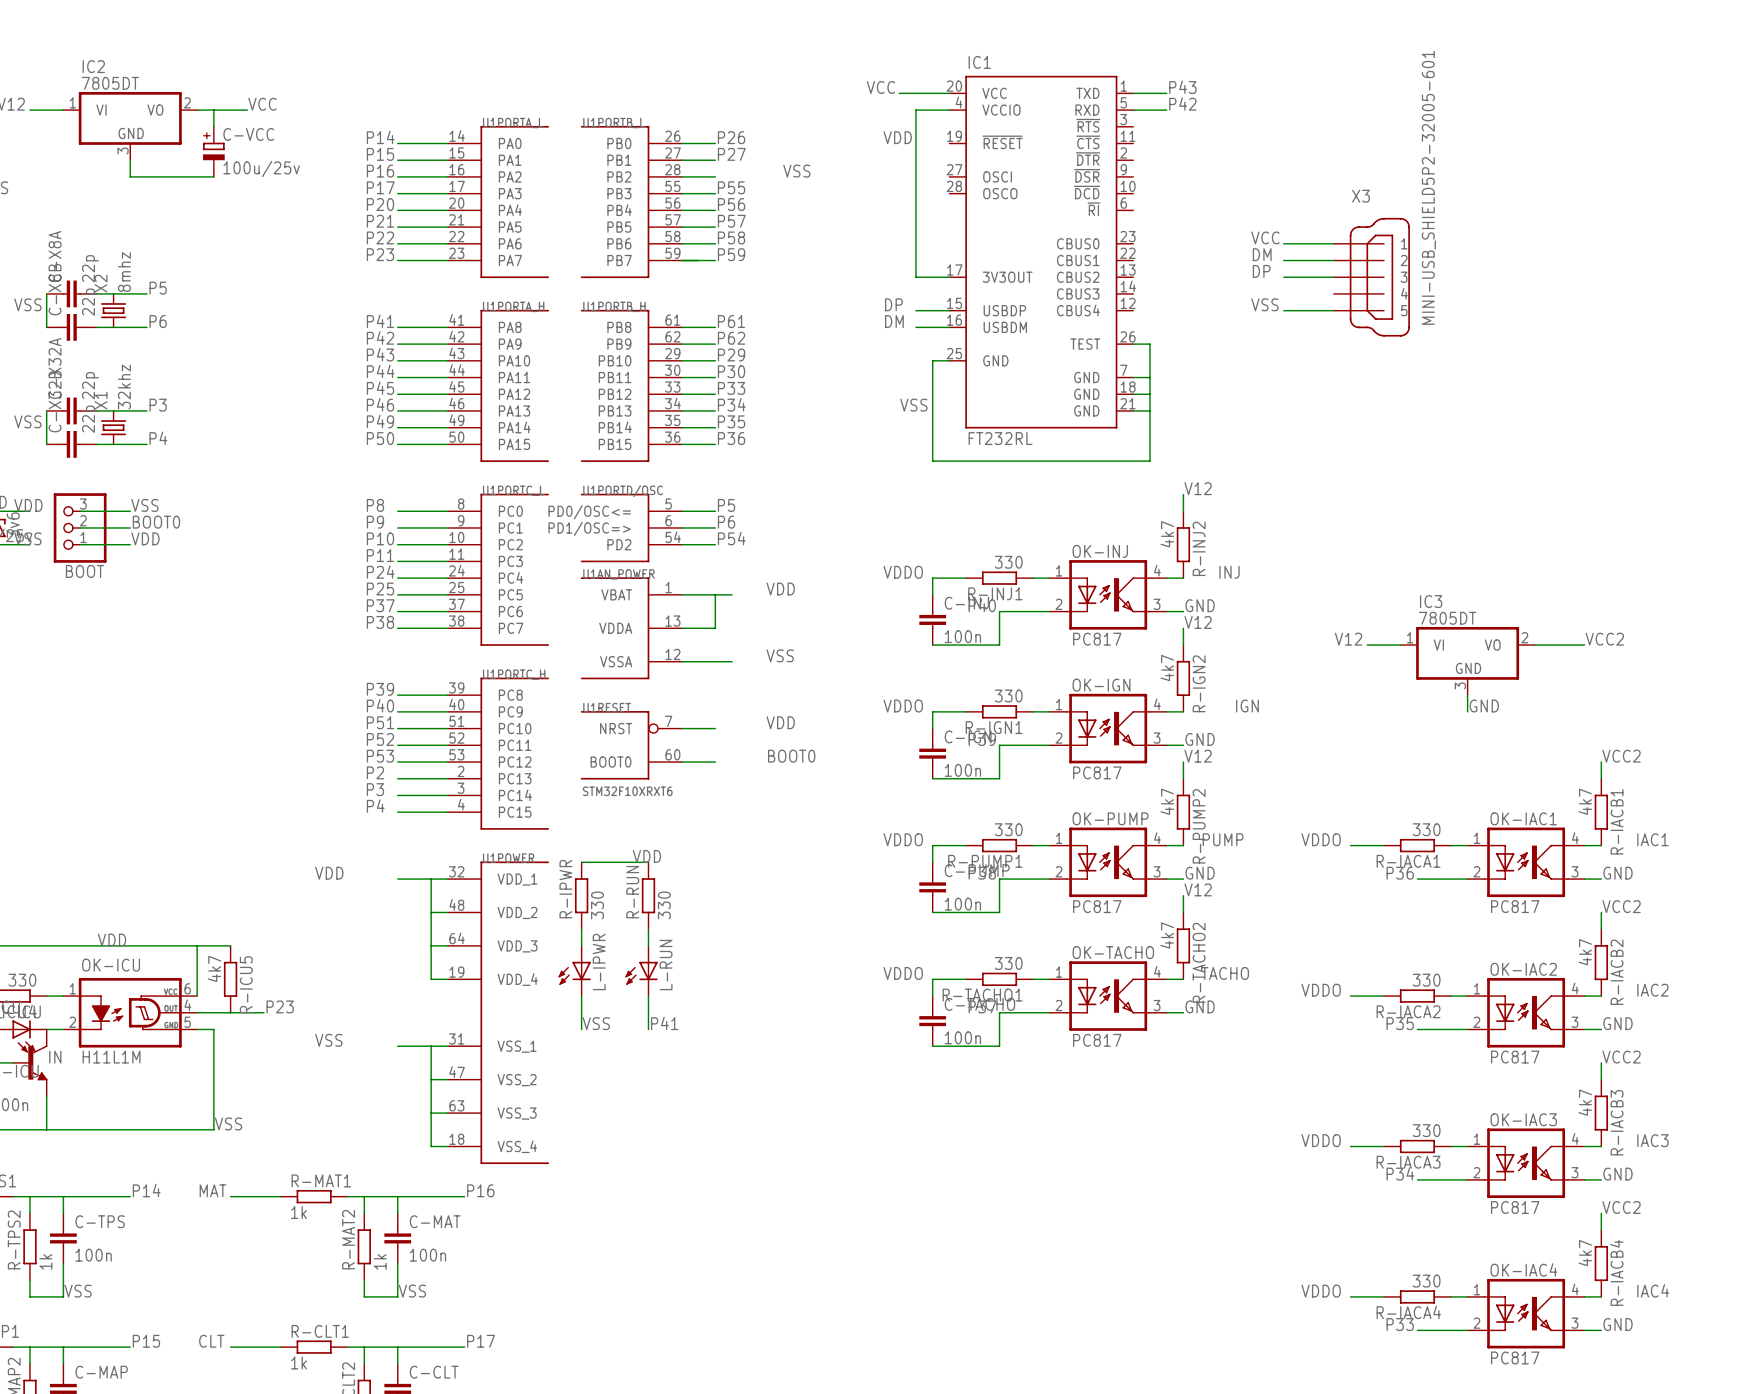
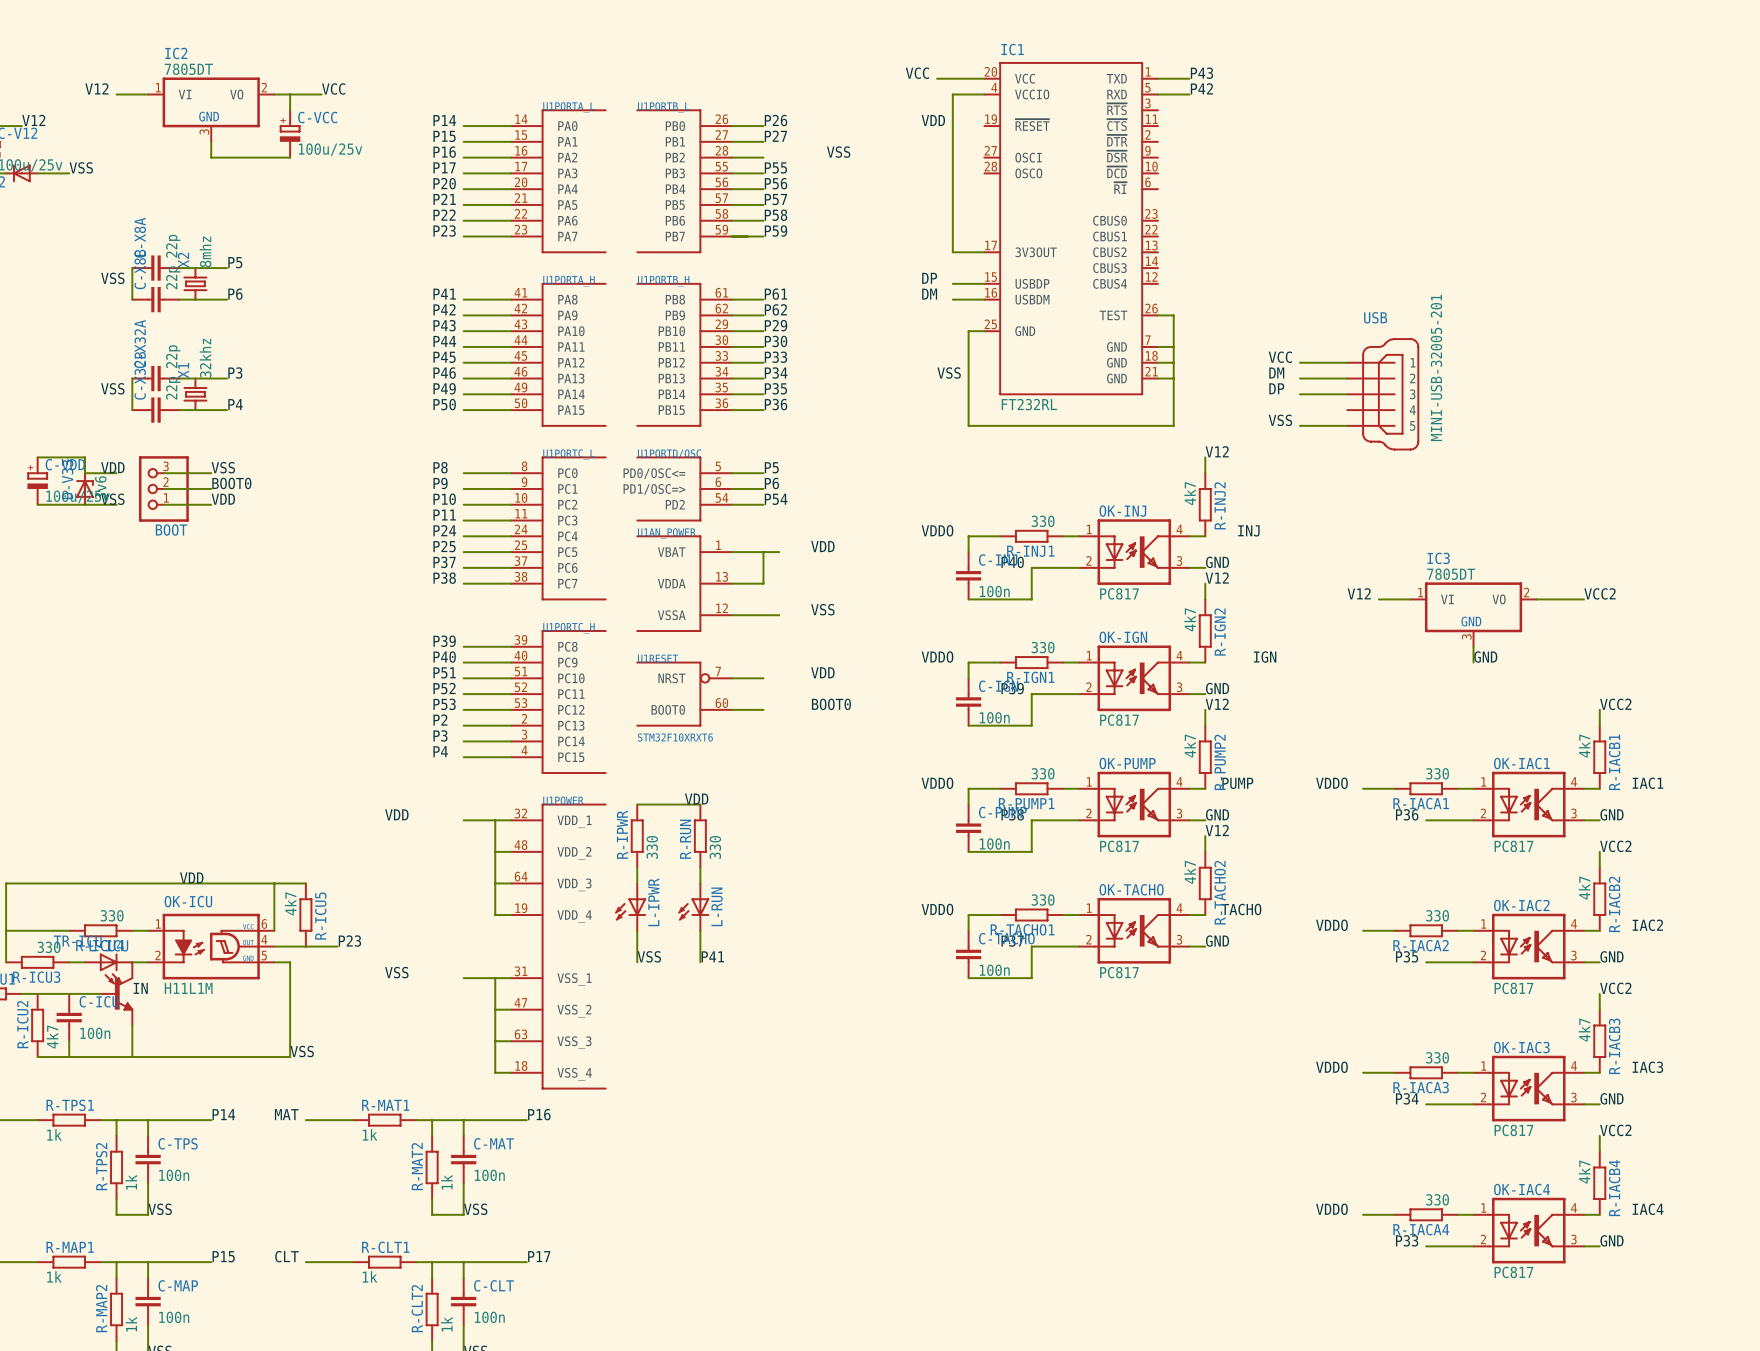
label position: VCC (1265, 237) -> VCC (1280, 357)
wire: (1283, 243) (1333, 243) -> none
label position: DM (1262, 254) -> DM (1276, 373)
wire: (1283, 260) (1333, 260) -> none
label position: DP (1261, 271) -> DP (1276, 388)
wire: (1283, 277) (1333, 277) -> (1299, 378) (1347, 378)
X3: MINI-USB_SHIELD5P2-32005-601 (1371, 277) -> none
label position: VSS (1264, 304) -> VSS (1280, 420)
wire: (1283, 310) (1333, 310) -> (1299, 362) (1347, 362)
wire: none -> (1299, 394) (1347, 394)
USB: none -> MINI-USB-32005-201 (1383, 394)
wire: none -> (1299, 425) (1347, 425)

